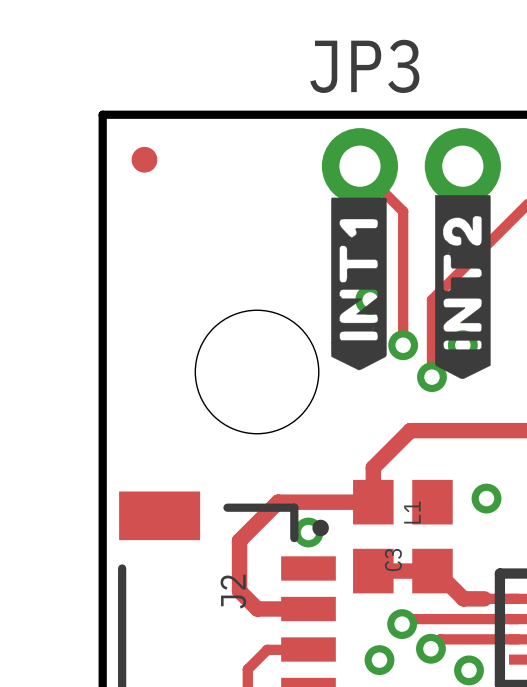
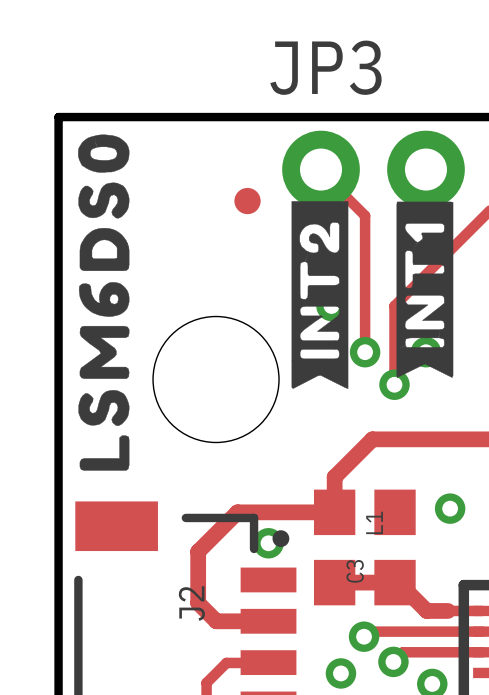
drawing: none -> [78, 134, 130, 471]
part position: (144, 159) -> (247, 201)
drawing shape: [435, 195, 491, 380] -> [396, 201, 454, 378]
drawing shape: [331, 197, 387, 371] -> [291, 201, 349, 389]

